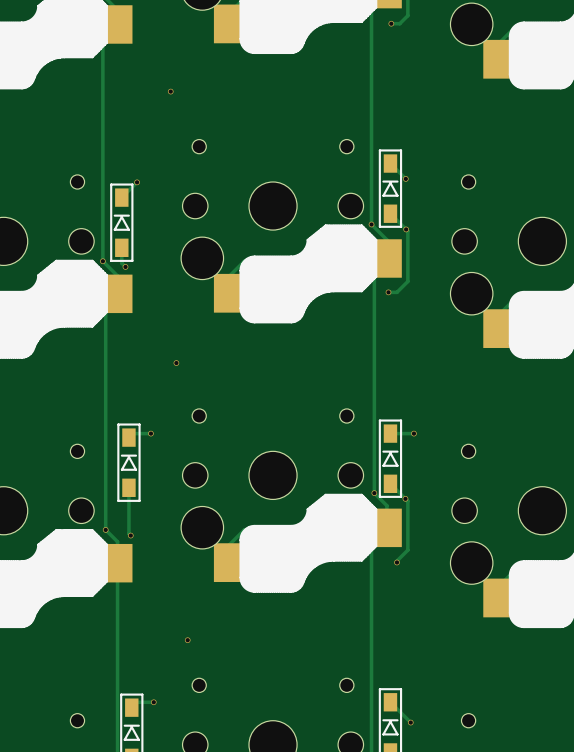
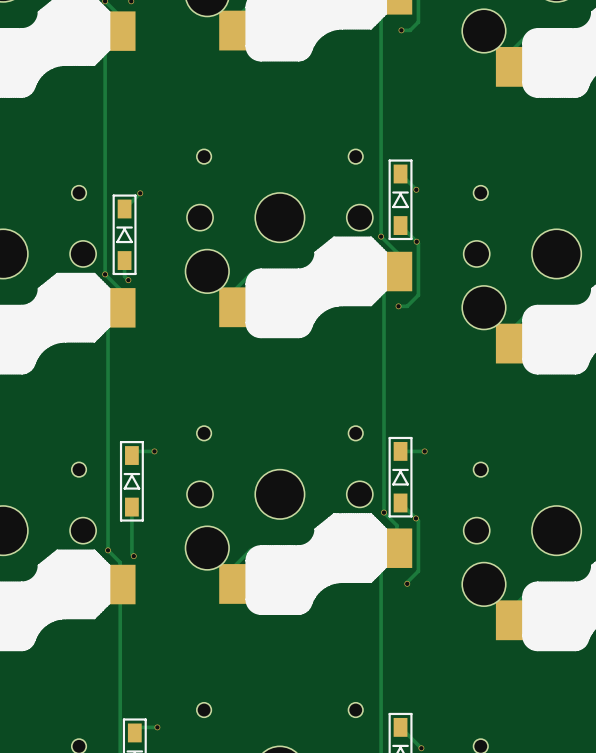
via: (170, 91) -> none
via: (176, 363) -> none
via: (187, 640) -> none

